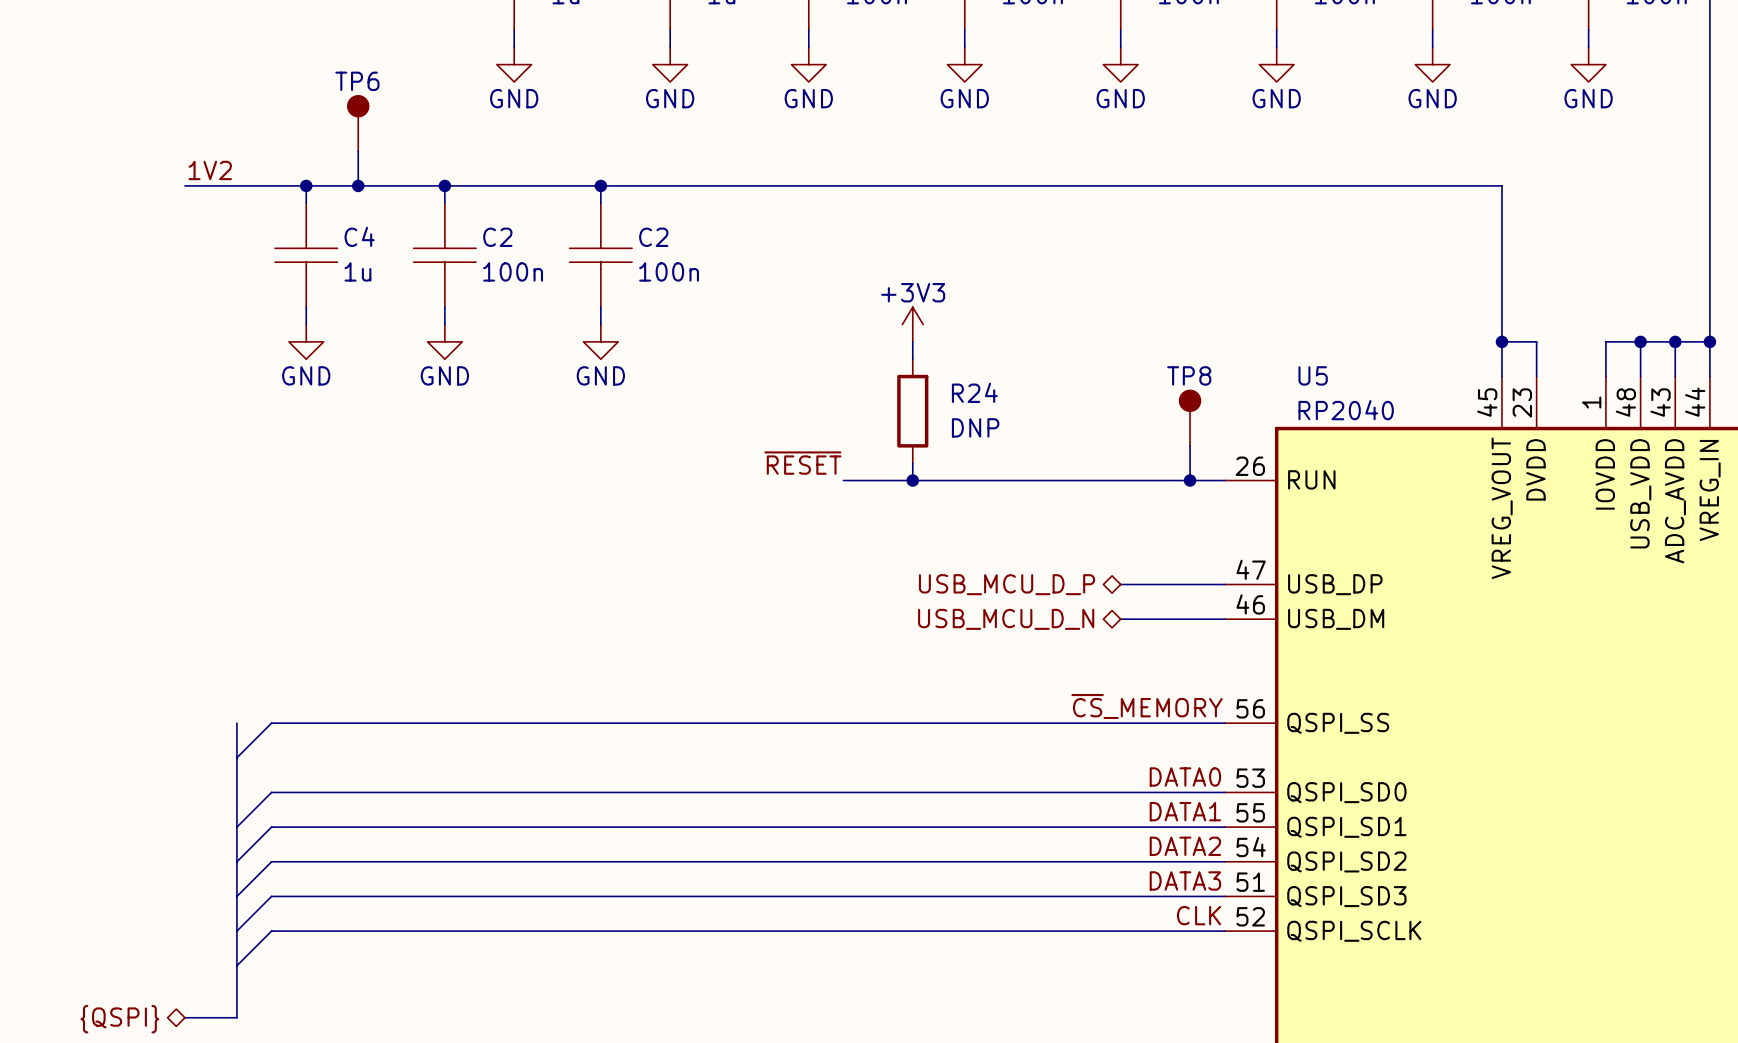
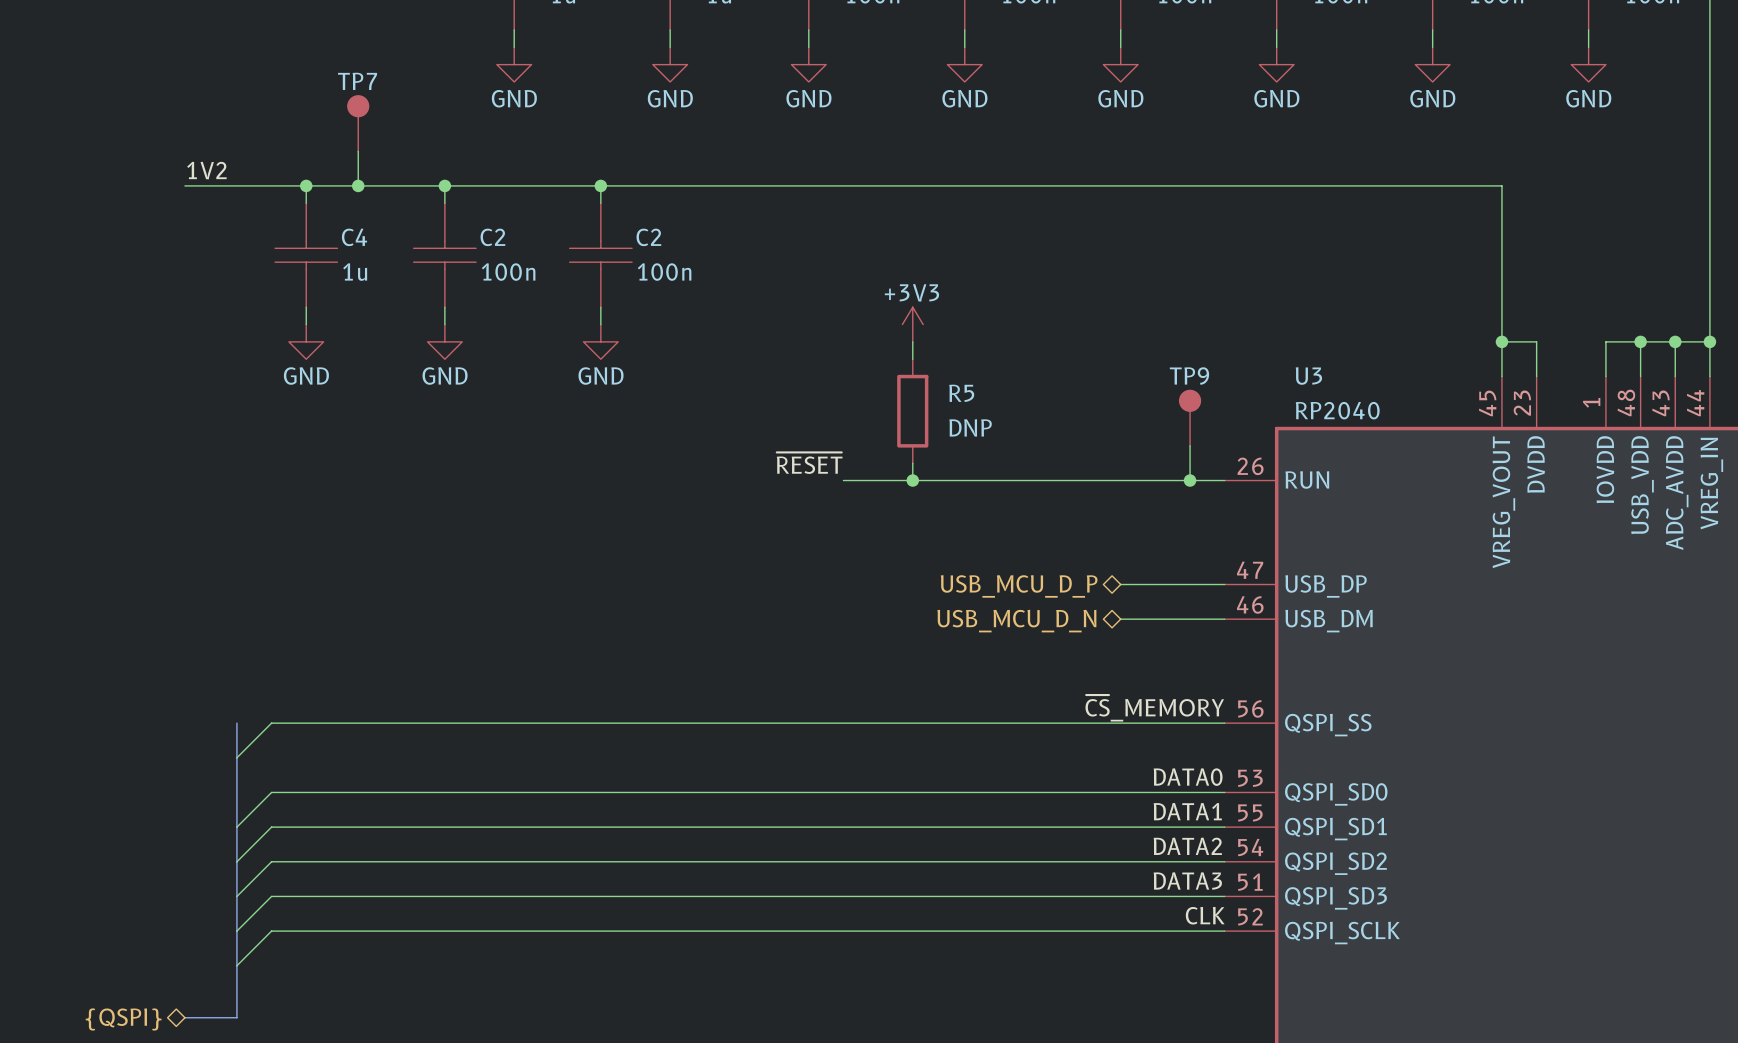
TP6 name: TP6 (357, 81) -> TP7 (357, 81)
TP8 name: TP8 (1189, 375) -> TP9 (1189, 376)
U5 name: U5 (1313, 375) -> U3 (1308, 376)
R24 name: R24 (974, 392) -> R5 (961, 393)

